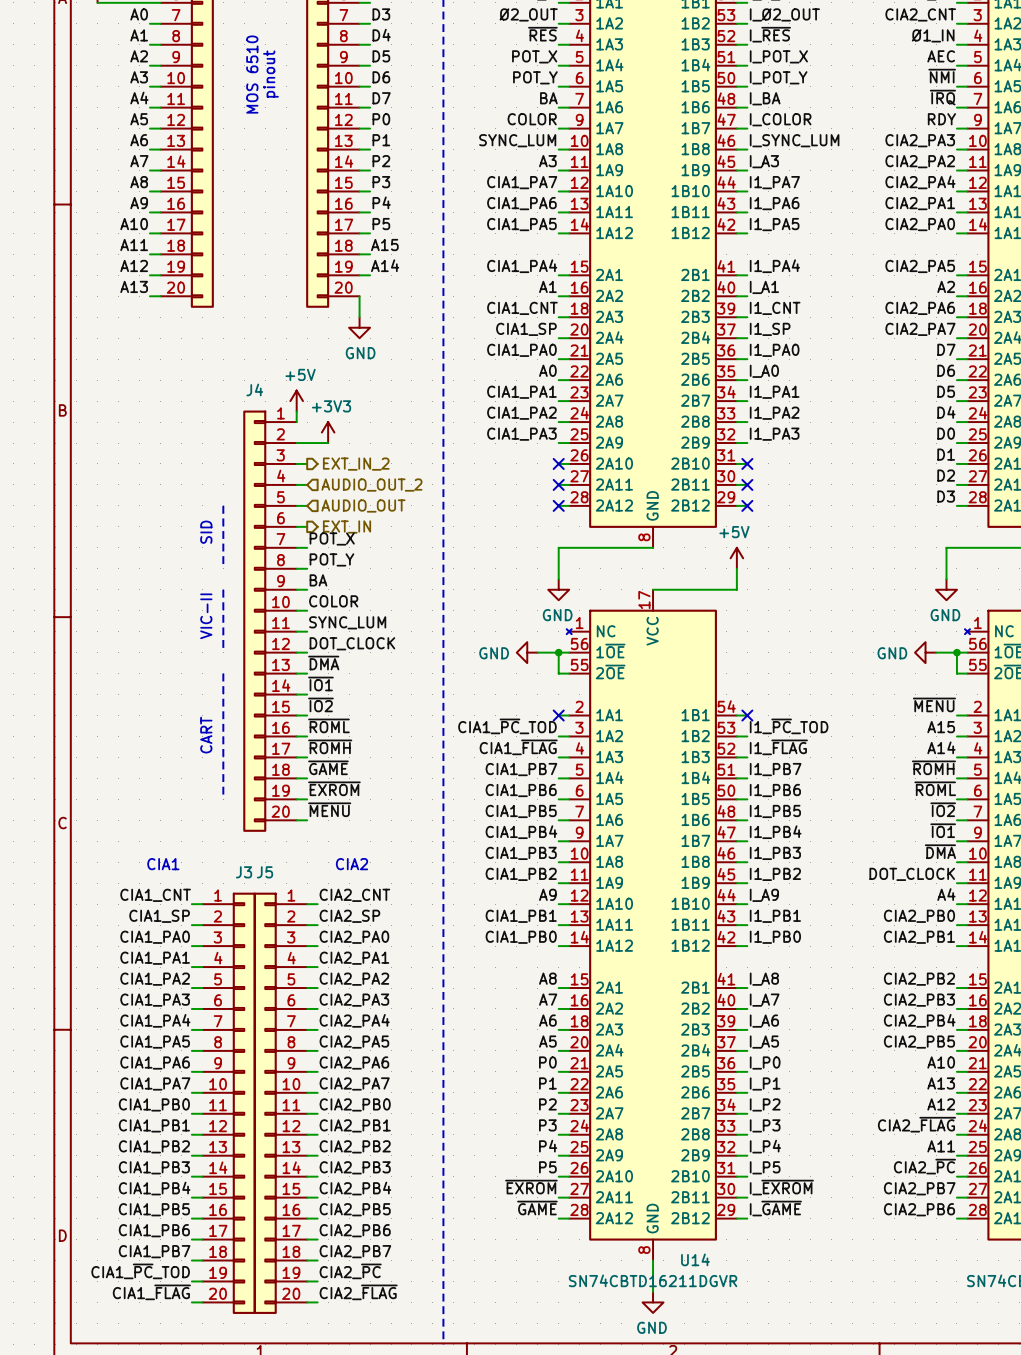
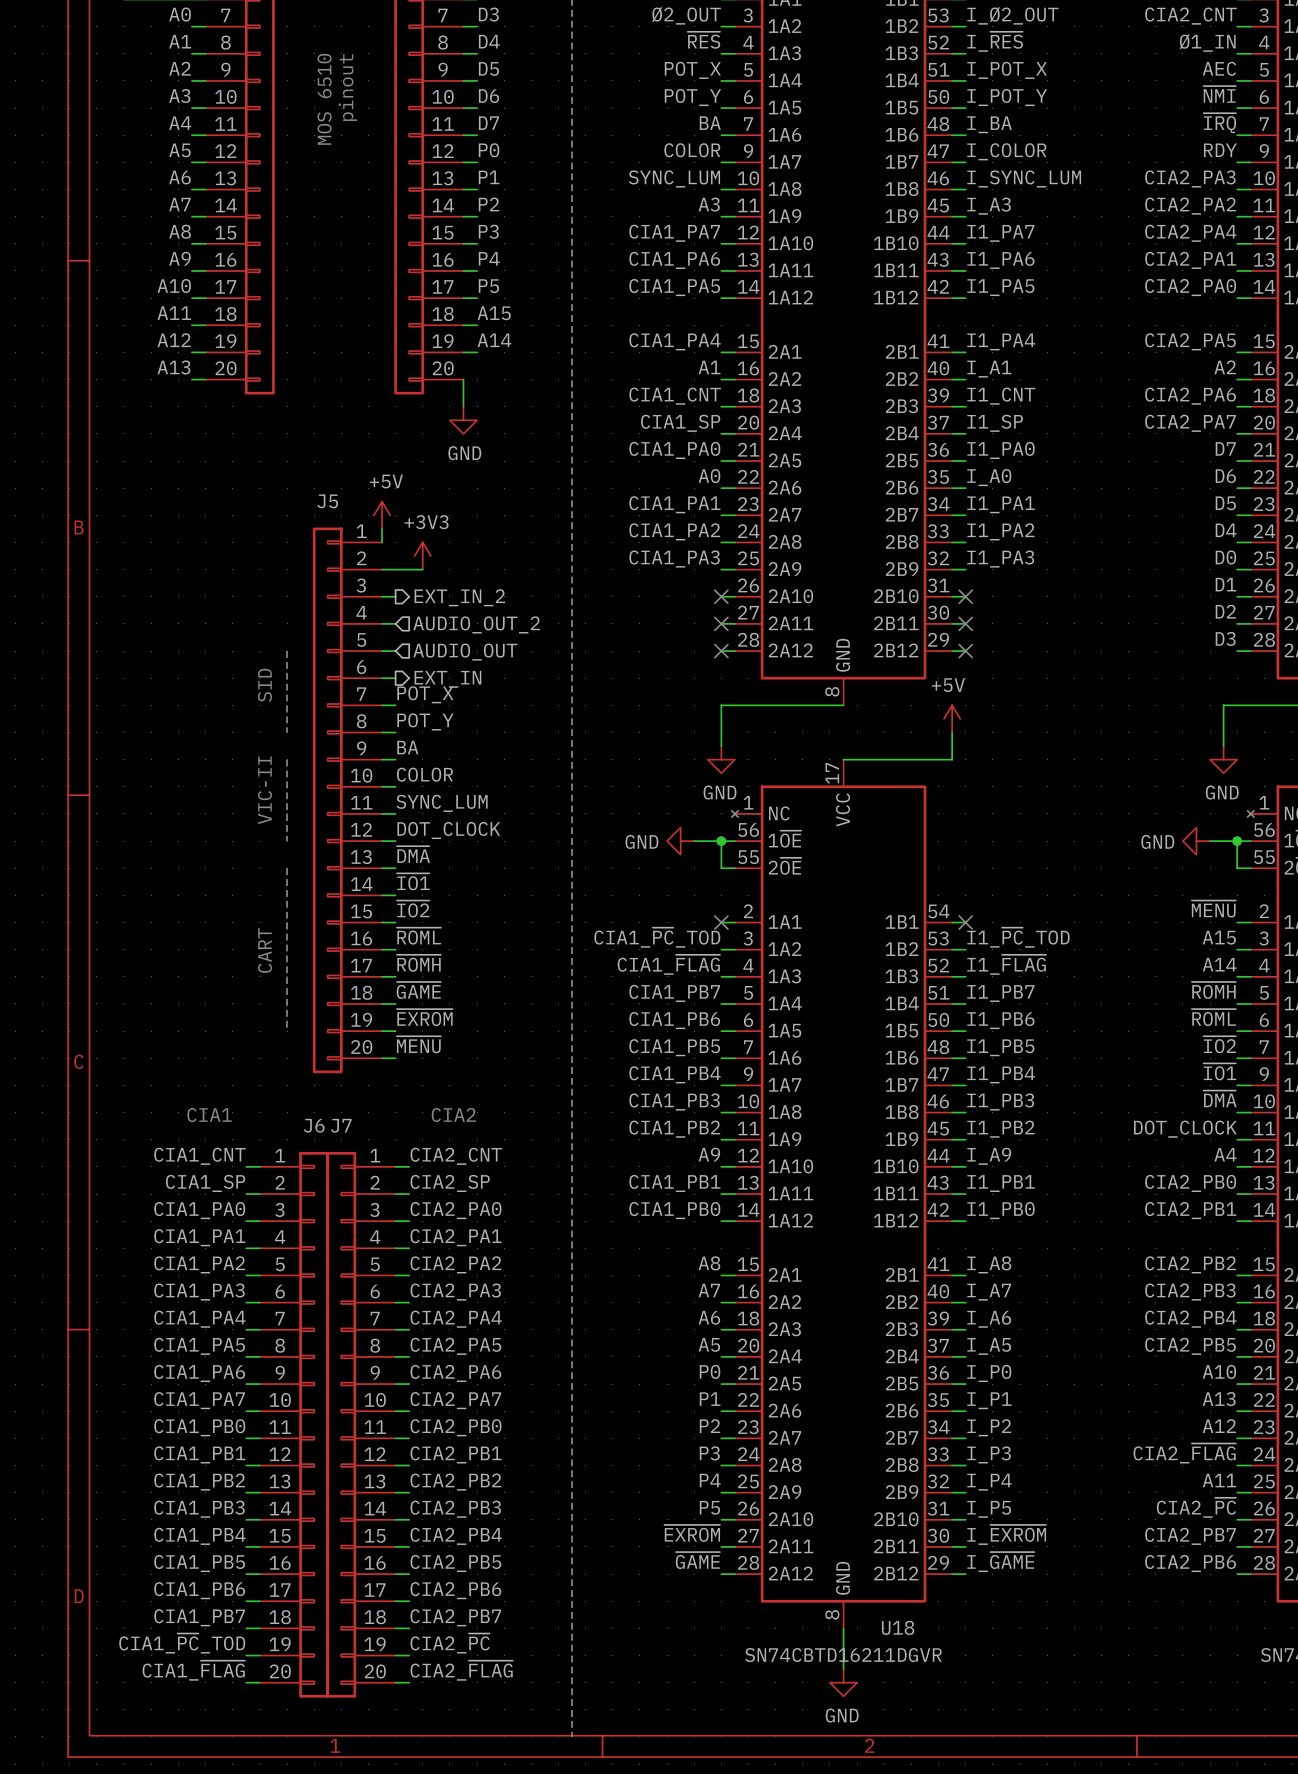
J4 name: J4 (254, 389) -> J5 (327, 501)
J3 name: J3 (244, 872) -> J6 (314, 1125)
J5 name: J5 (264, 872) -> J7 (341, 1125)
U14 name: U14 (695, 1259) -> U18 (898, 1627)

